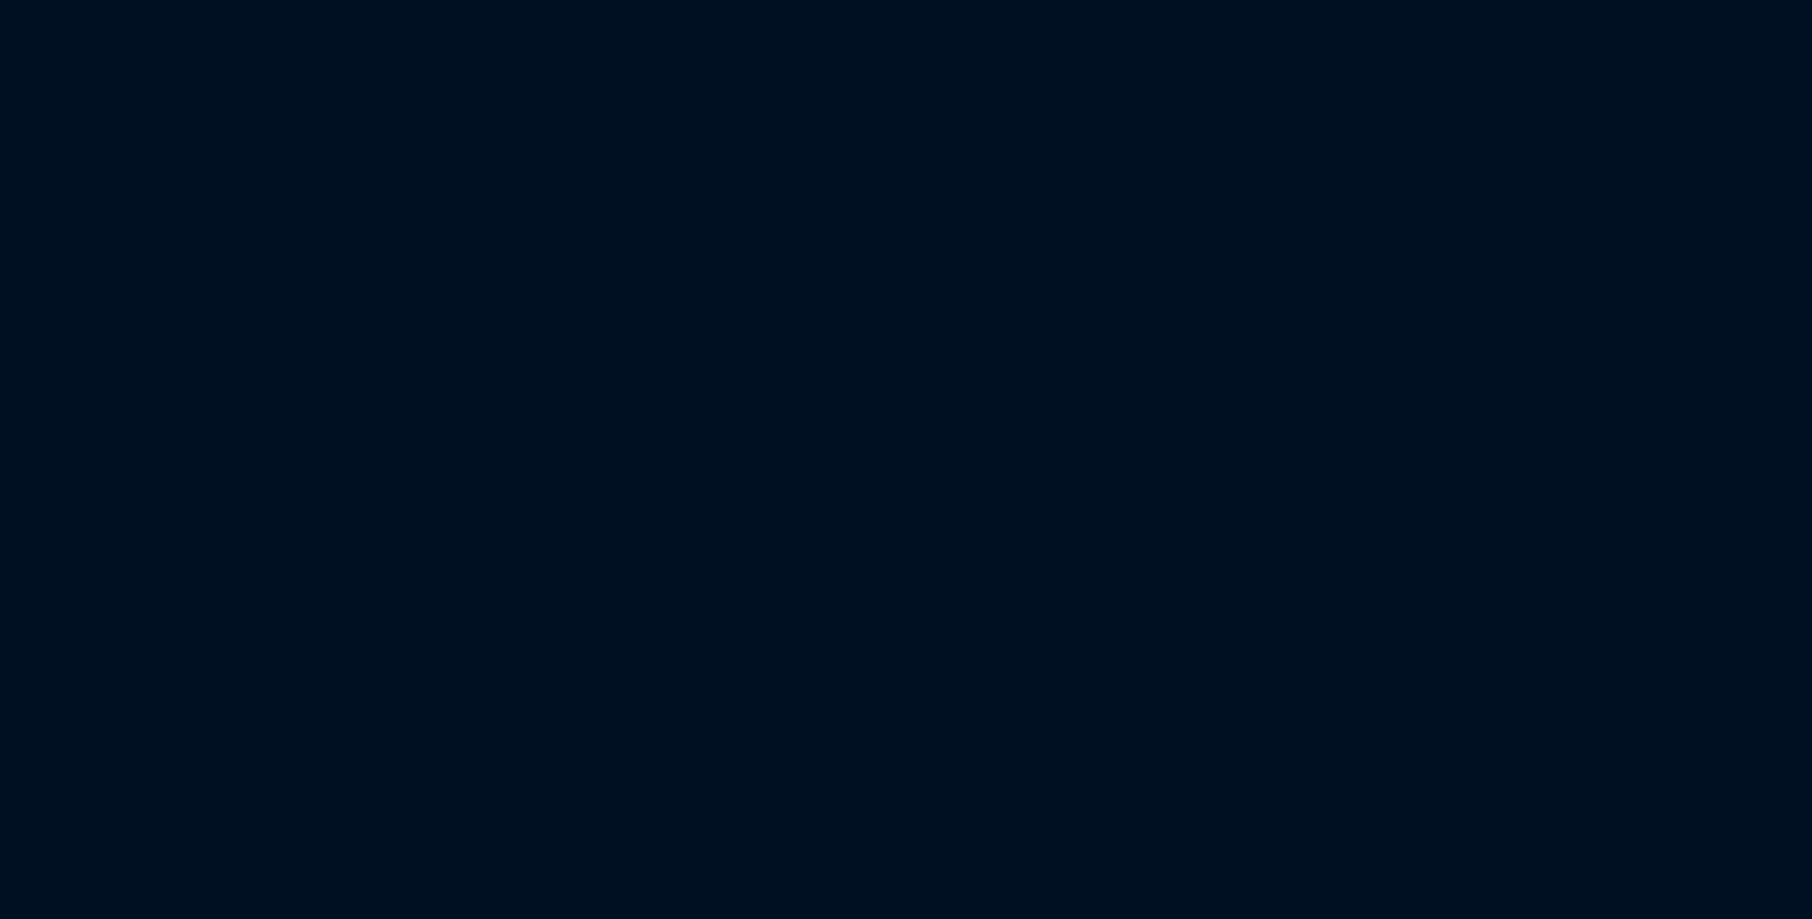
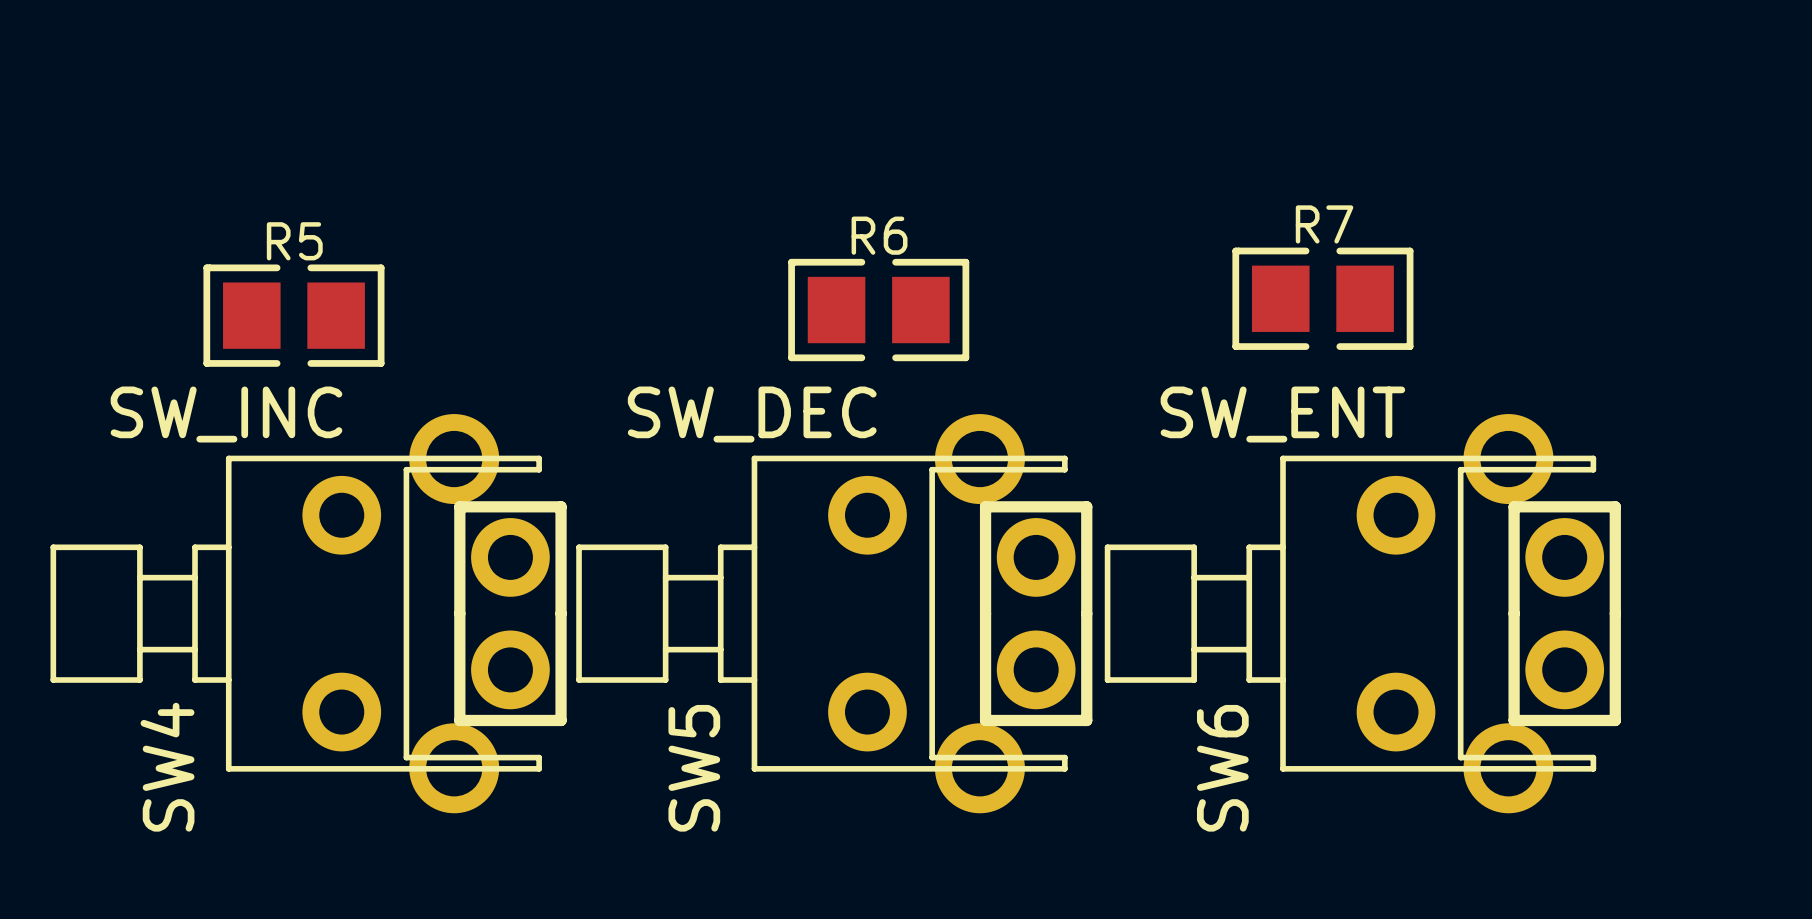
R7: none -> (1322, 298)
R6: none -> (878, 310)
R5: none -> (293, 315)
SW4: none -> SW_INC (308, 613)
SW5: none -> SW_DEC (834, 613)
SW6: none -> SW_ENT (1362, 613)

